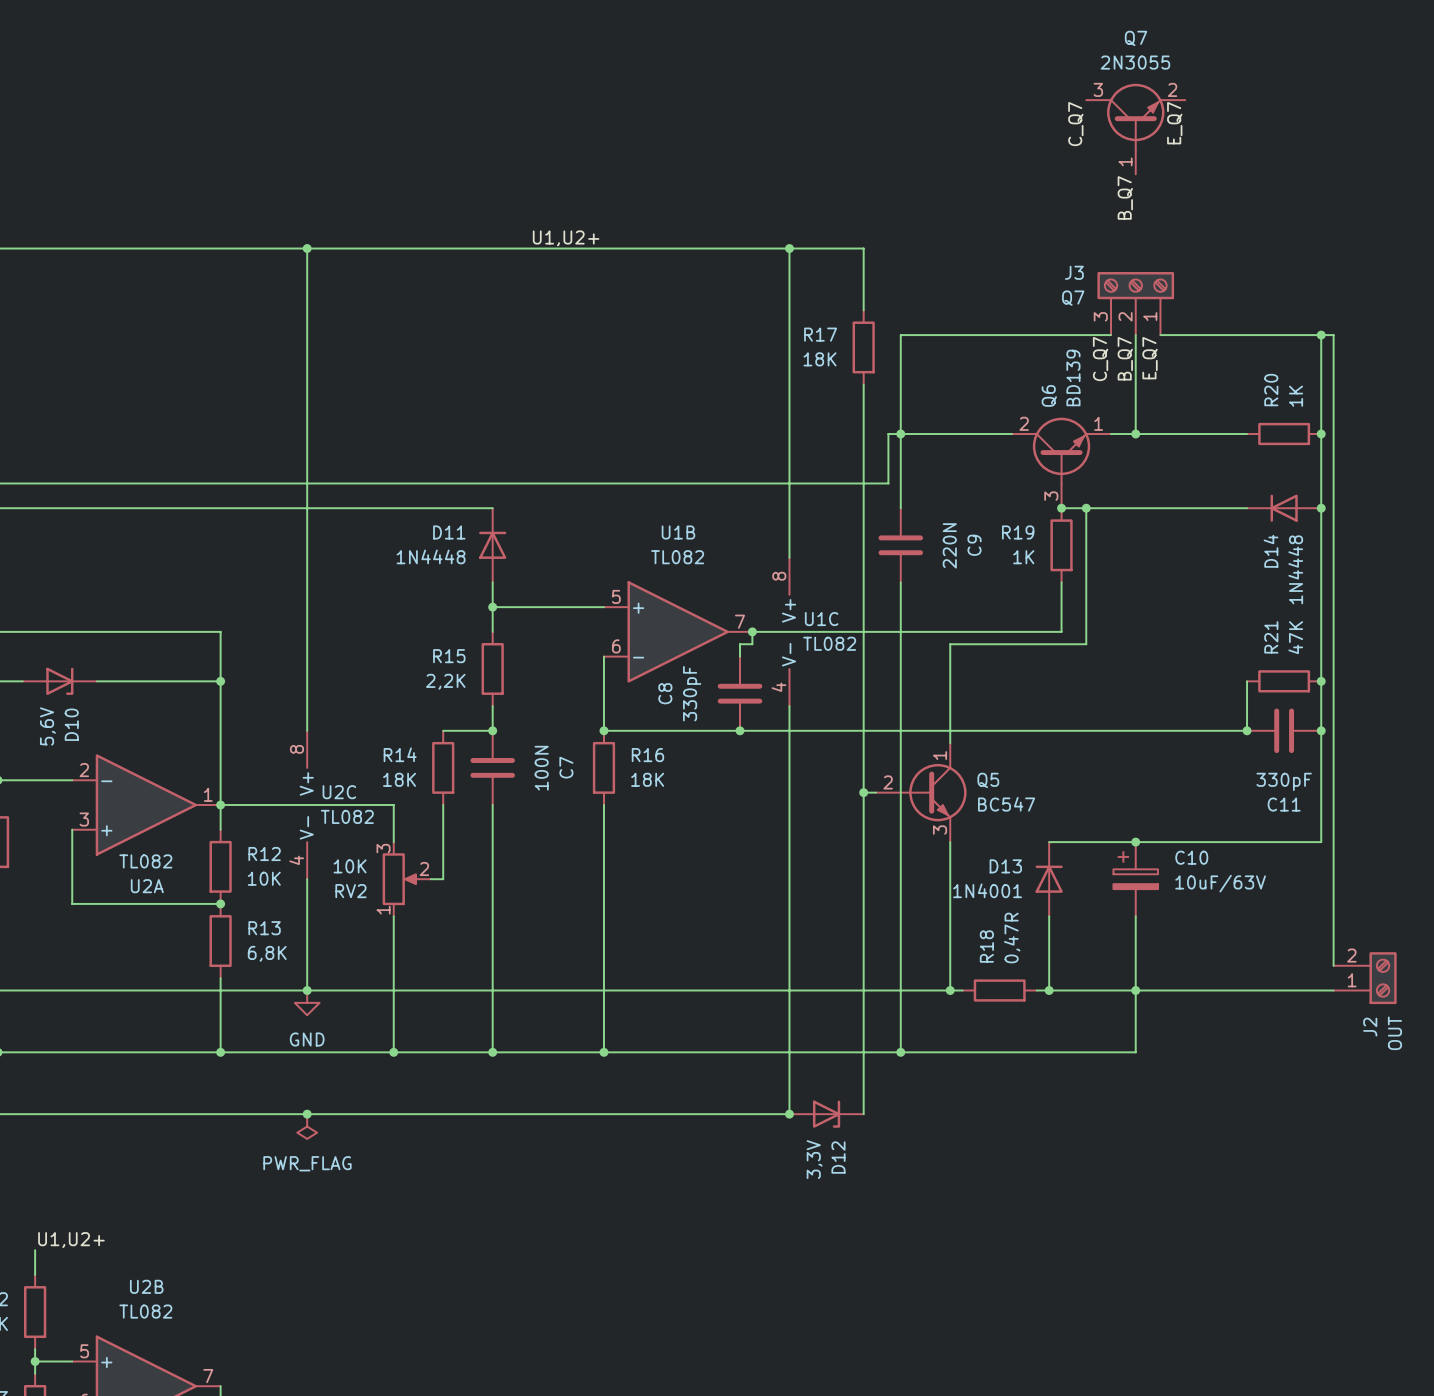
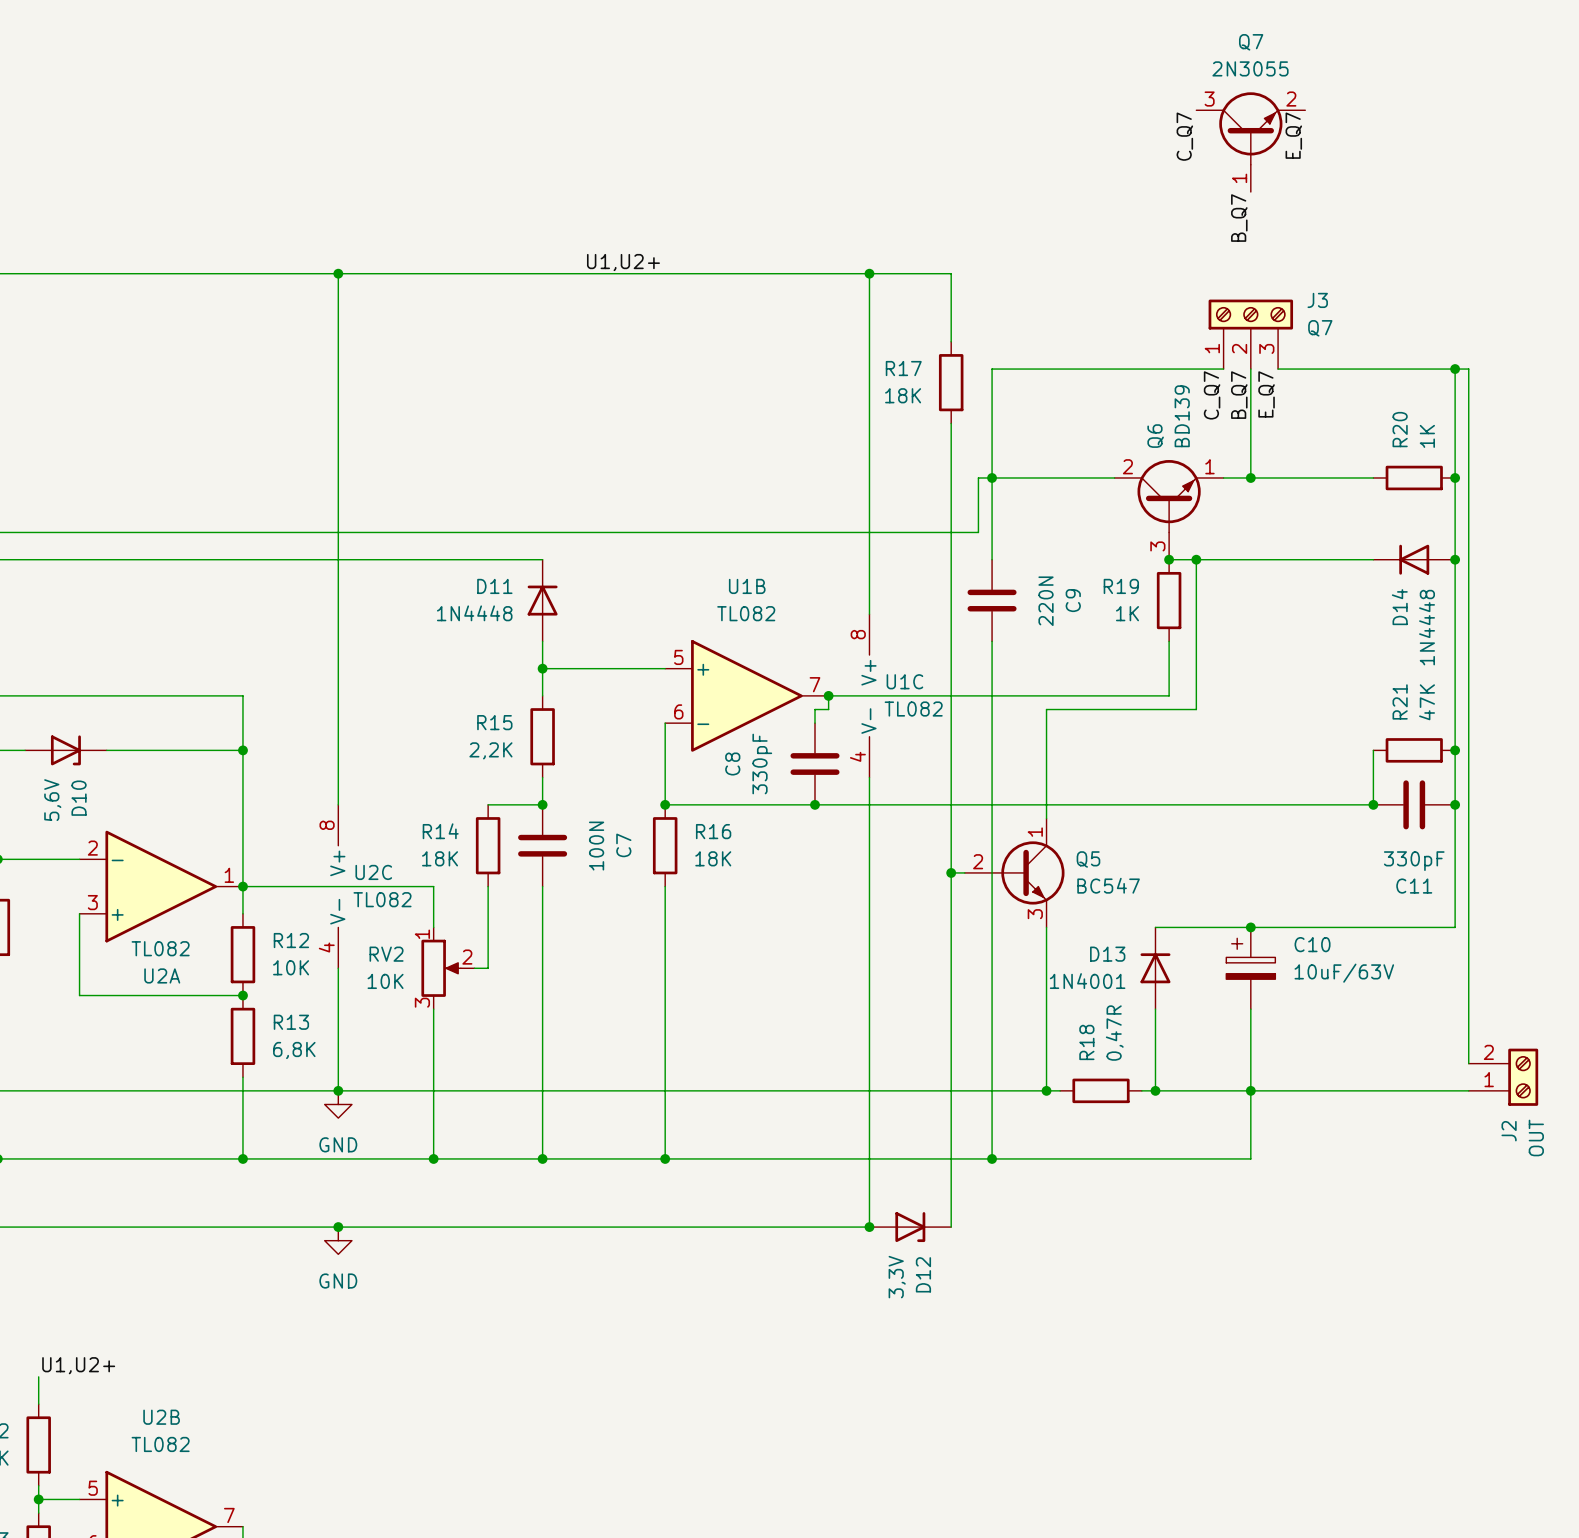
J3 flip: as is (1135, 285) -> left-right (1250, 314)
RV2 flip: as is (400, 879) -> up-down (441, 968)
power symbol: PWR_FLAG (307, 1126) -> GND (338, 1240)

